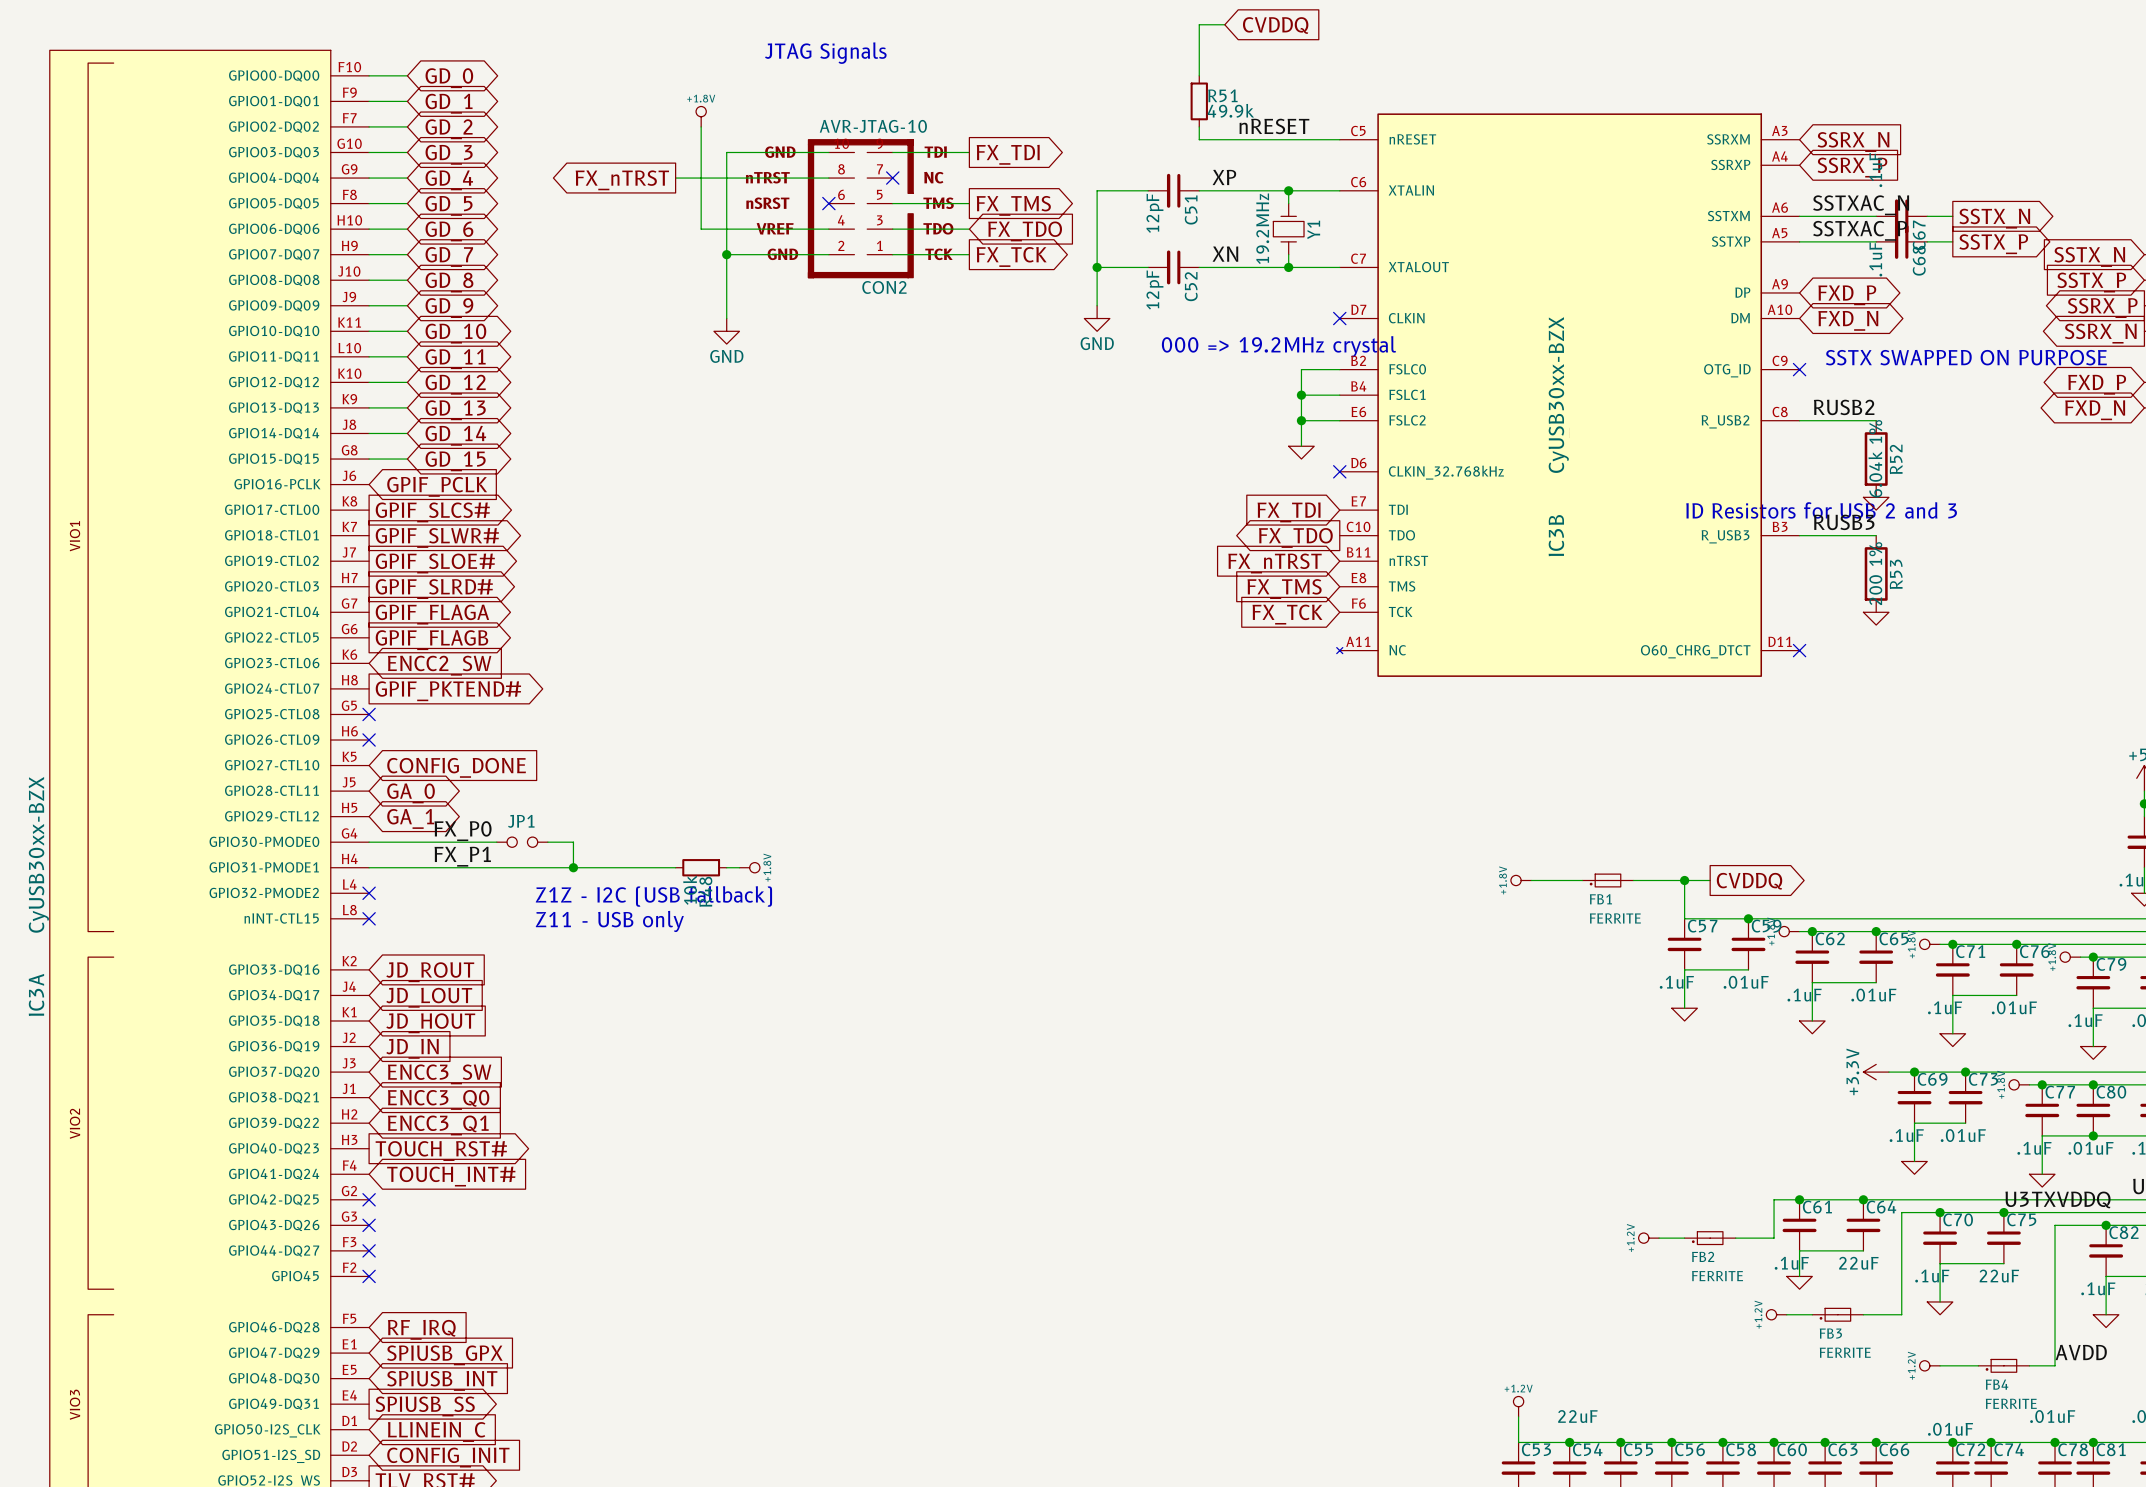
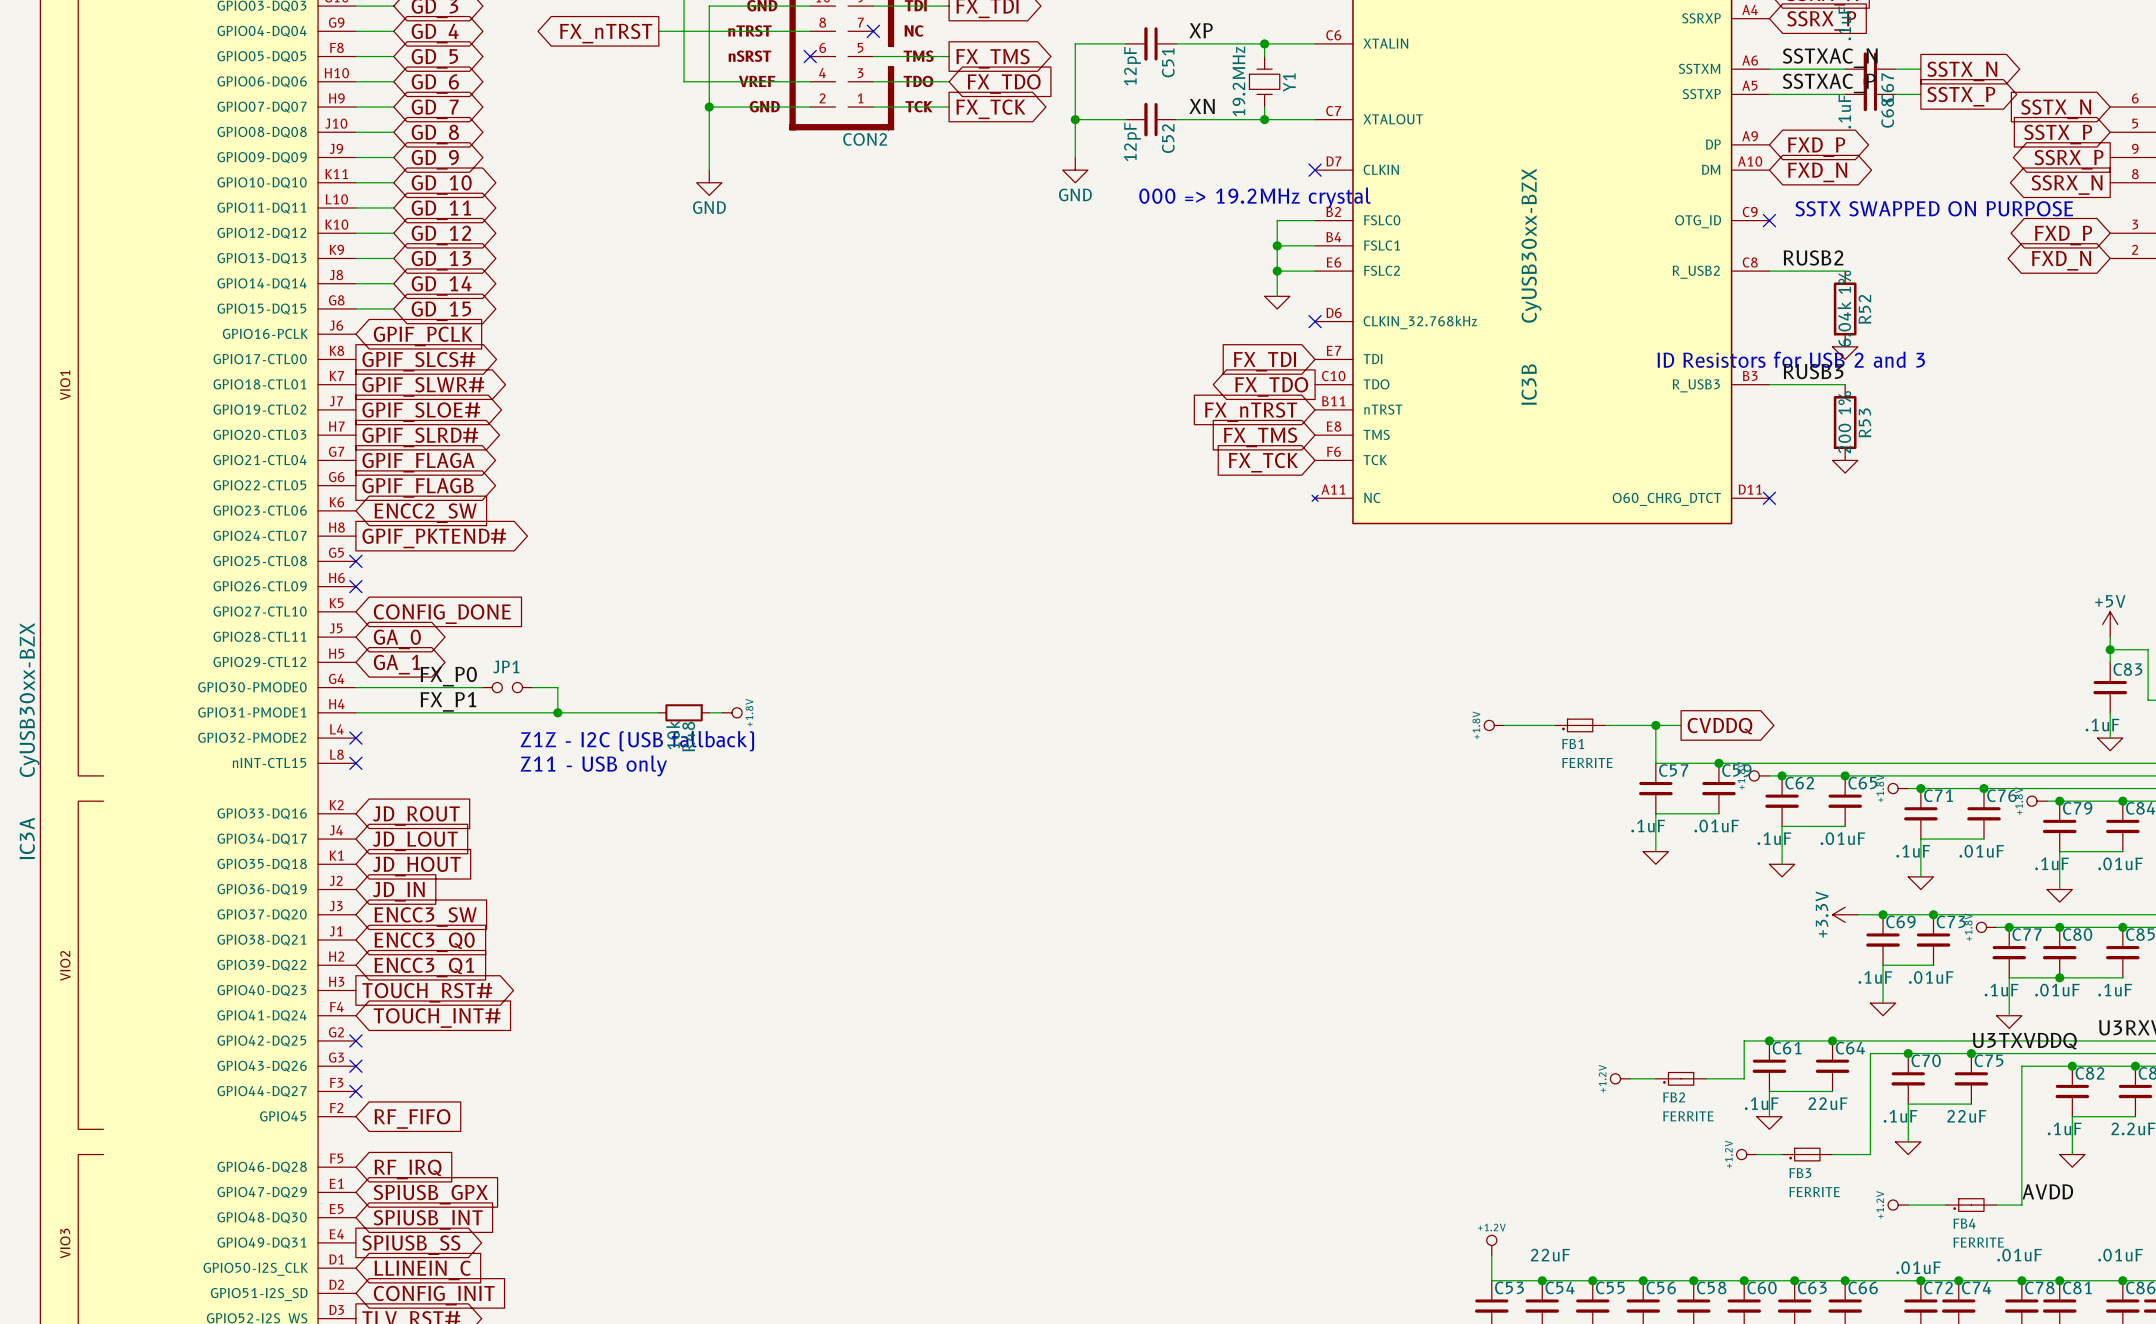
no-connect mark: (369, 1276) -> none
global label: none -> RF_FIFO (412, 1118)

